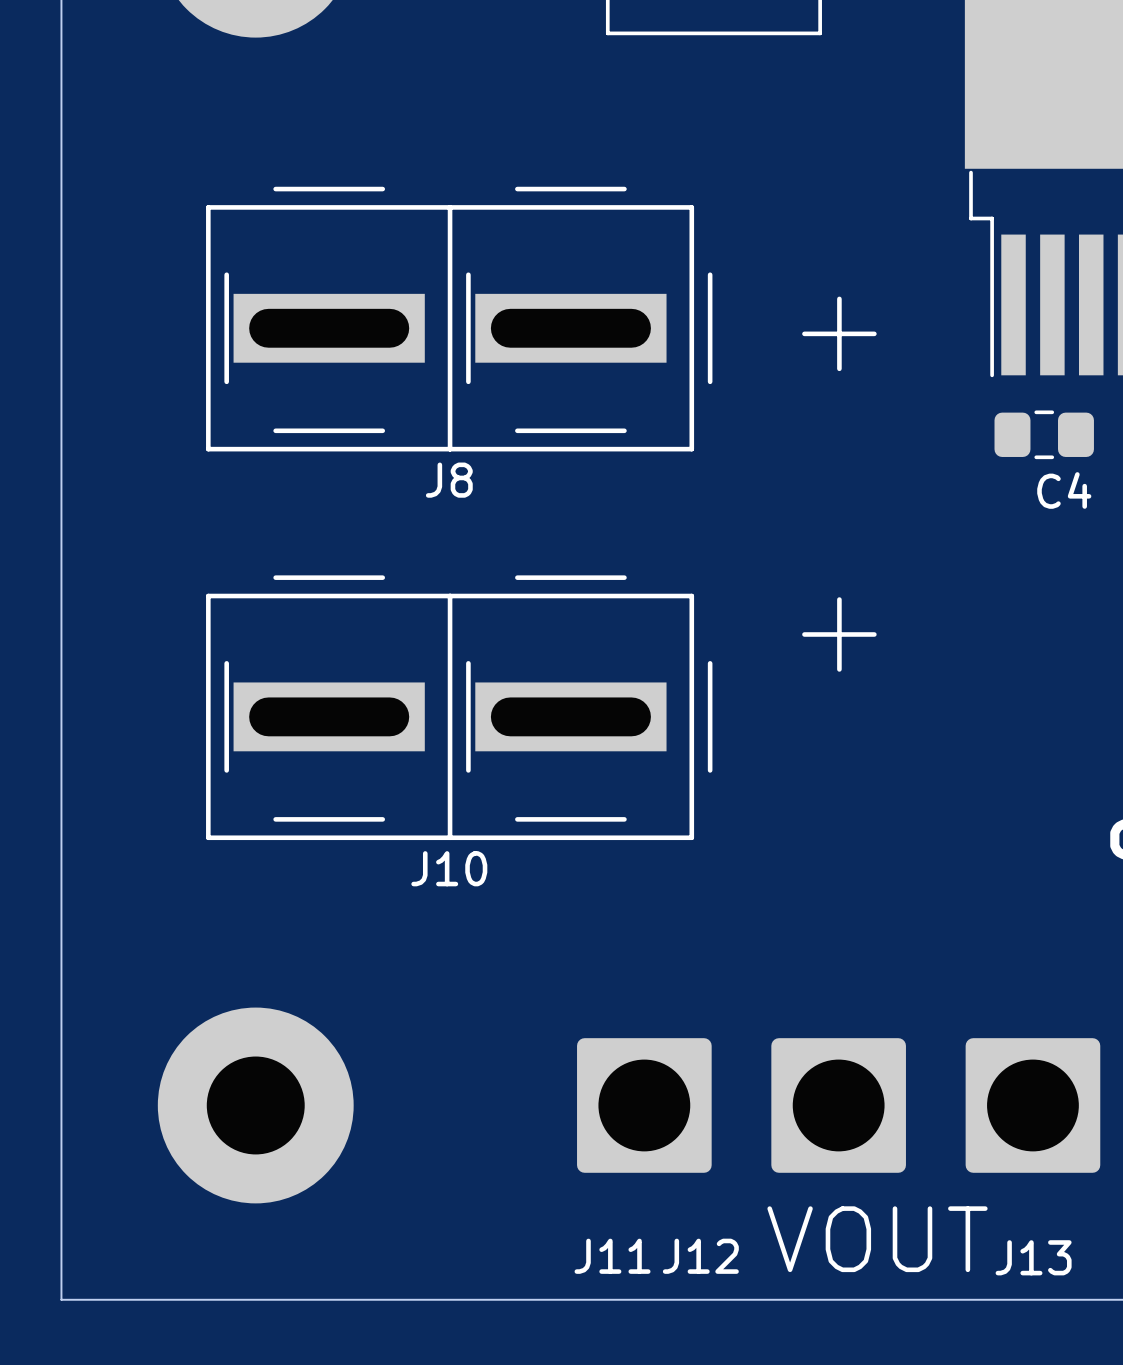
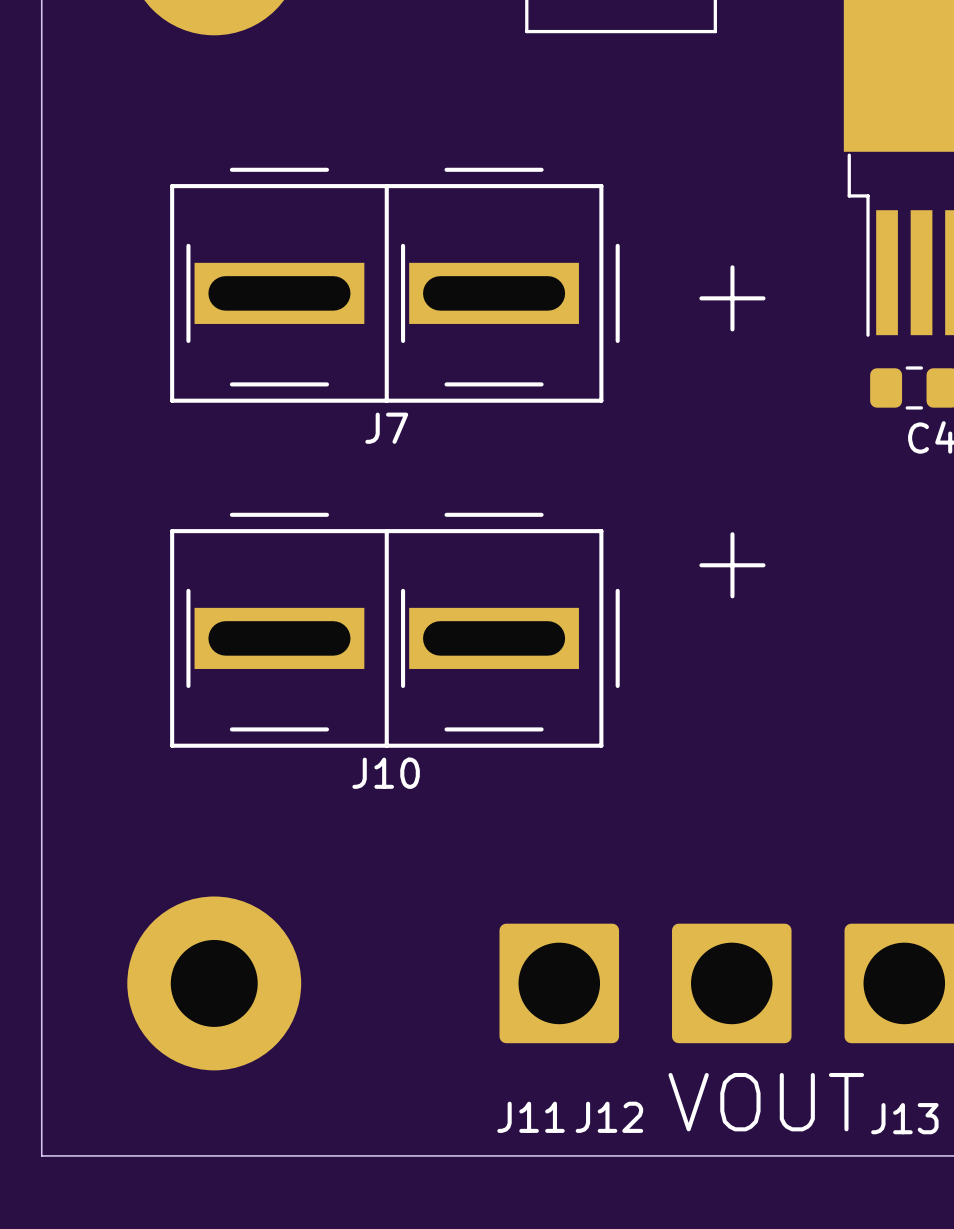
J8 name: J8 (449, 480) -> J7 (386, 428)

